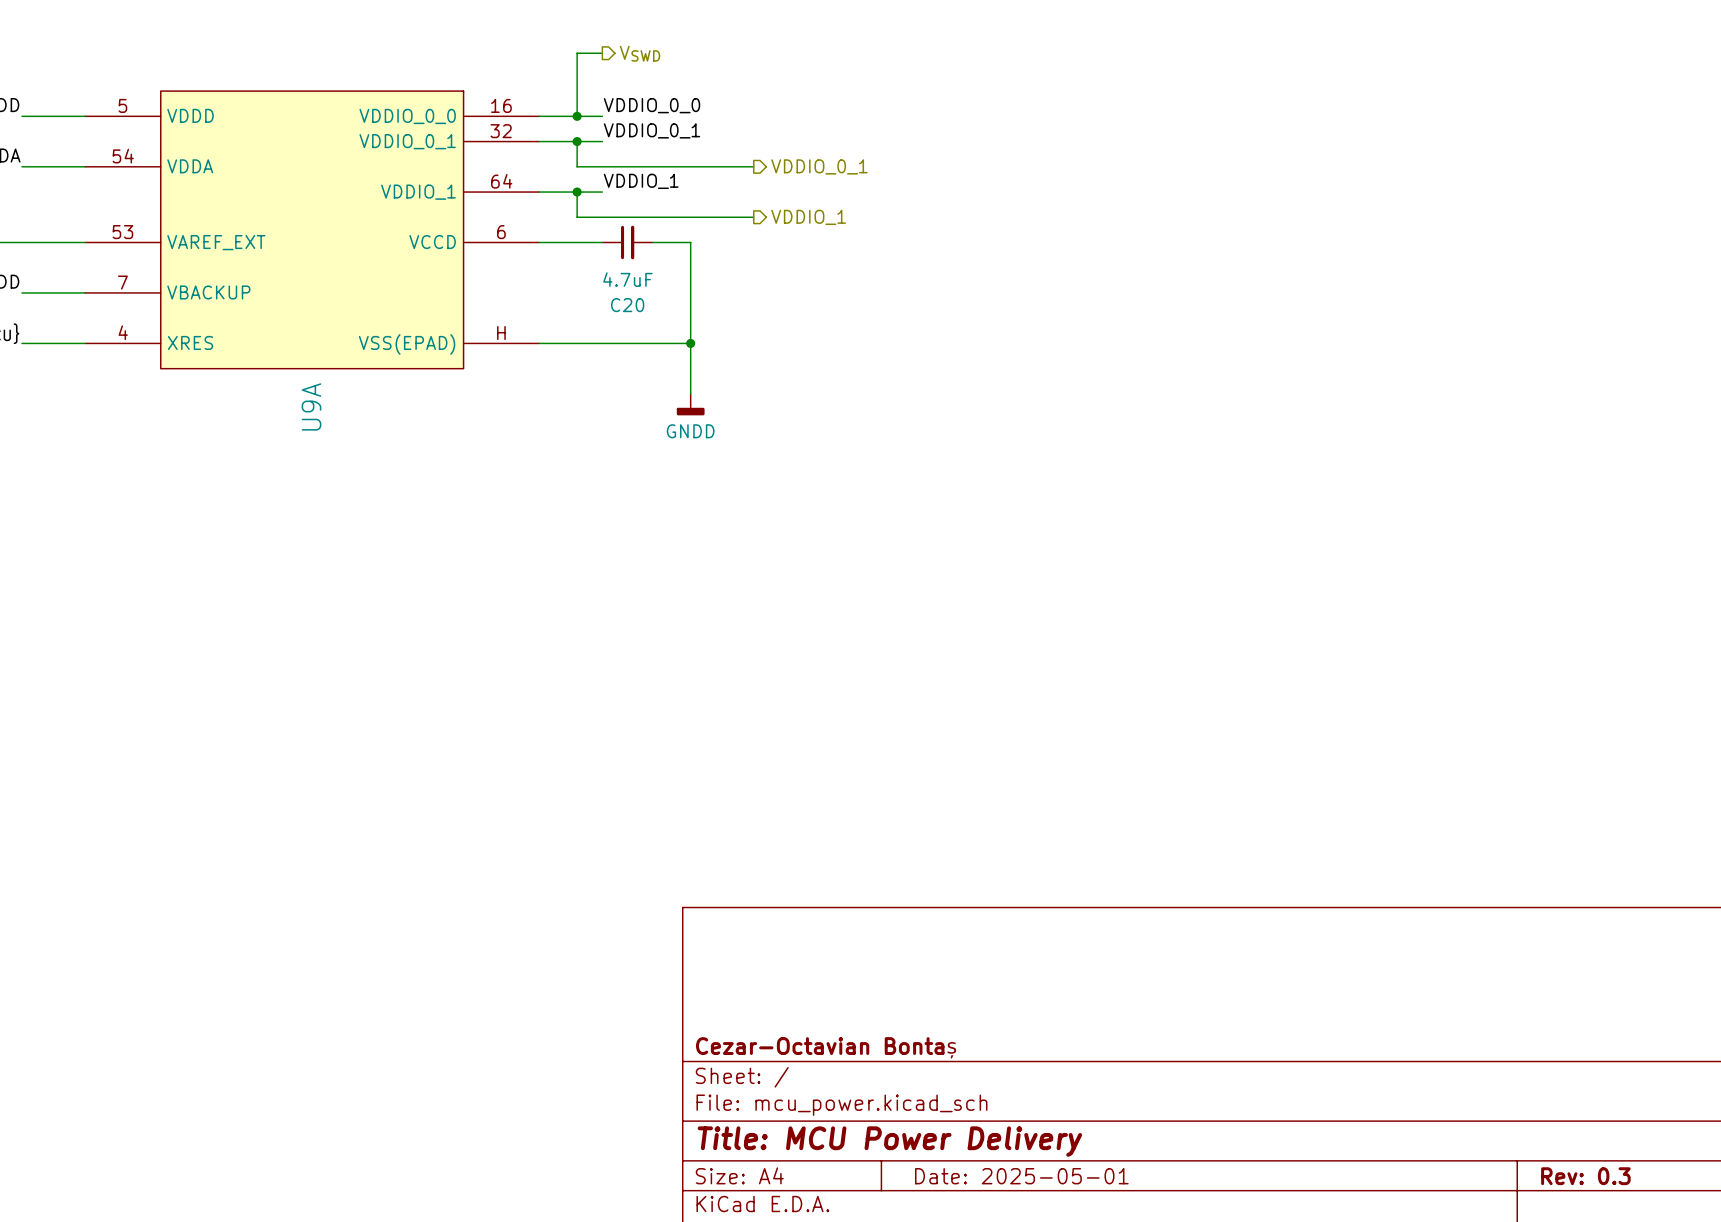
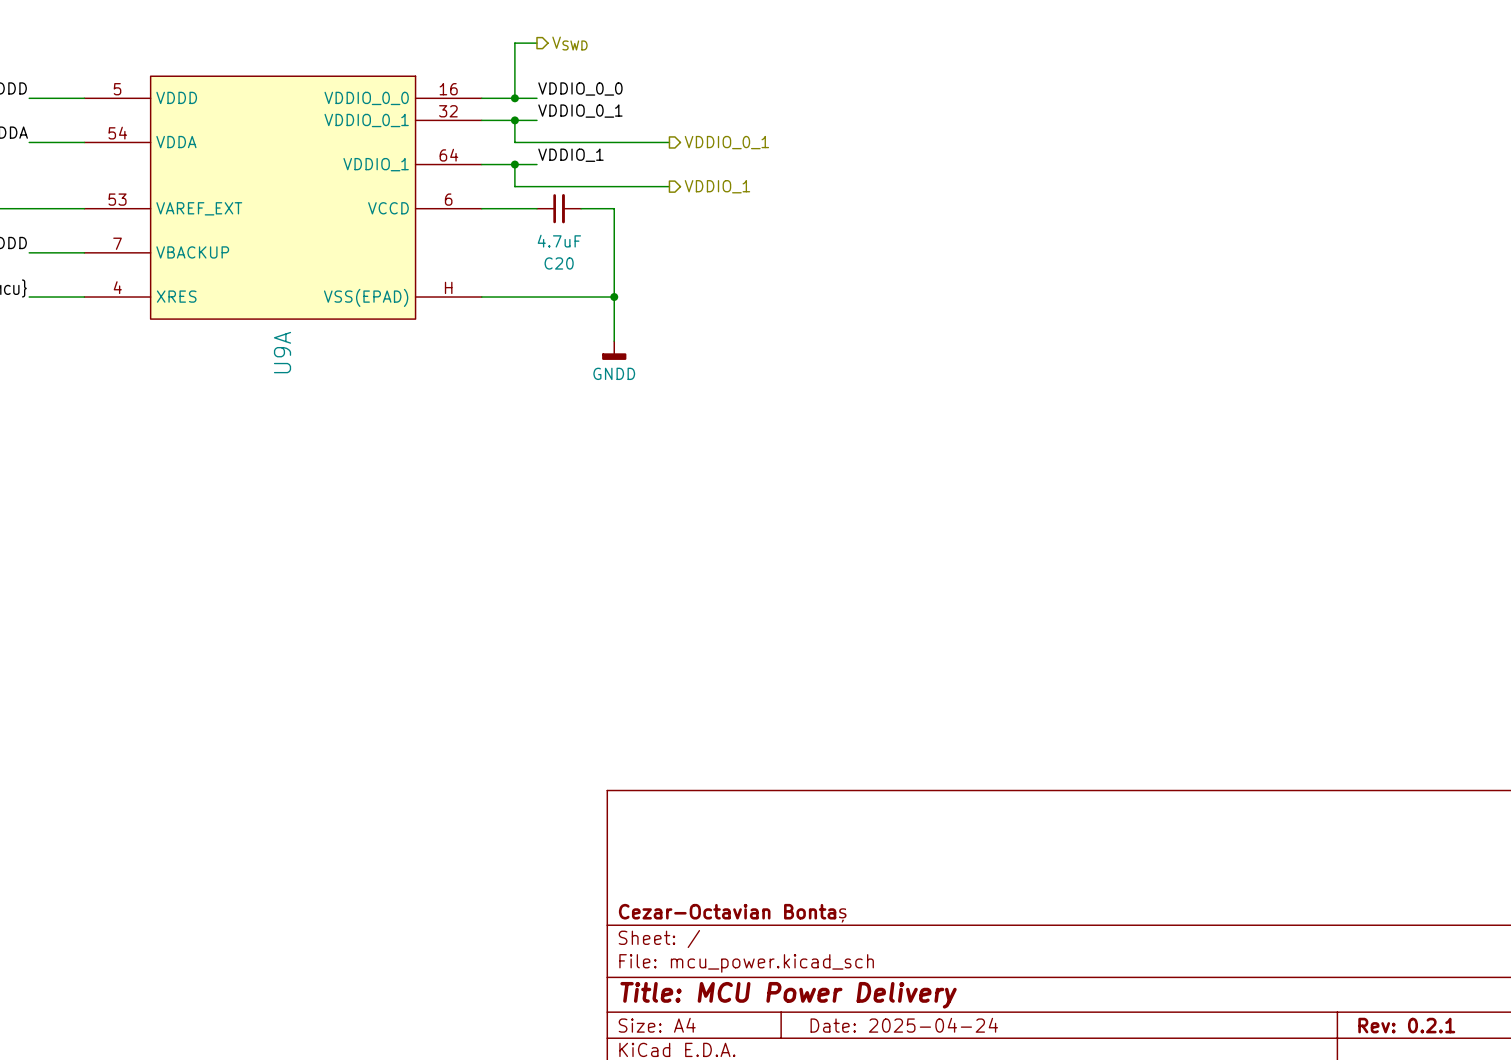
title block: Date: 2025-05-01 (1021, 1176) -> Date: 2025-04-24 (904, 1025)
title block: Rev: 0.3 (1585, 1176) -> Rev: 0.2.1 (1406, 1025)

